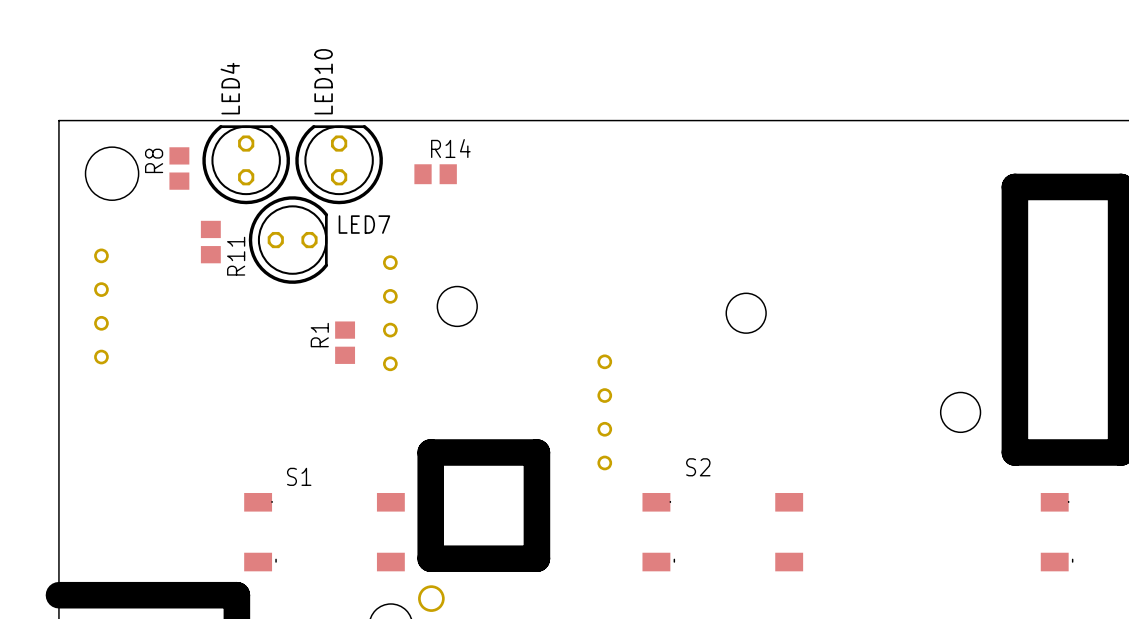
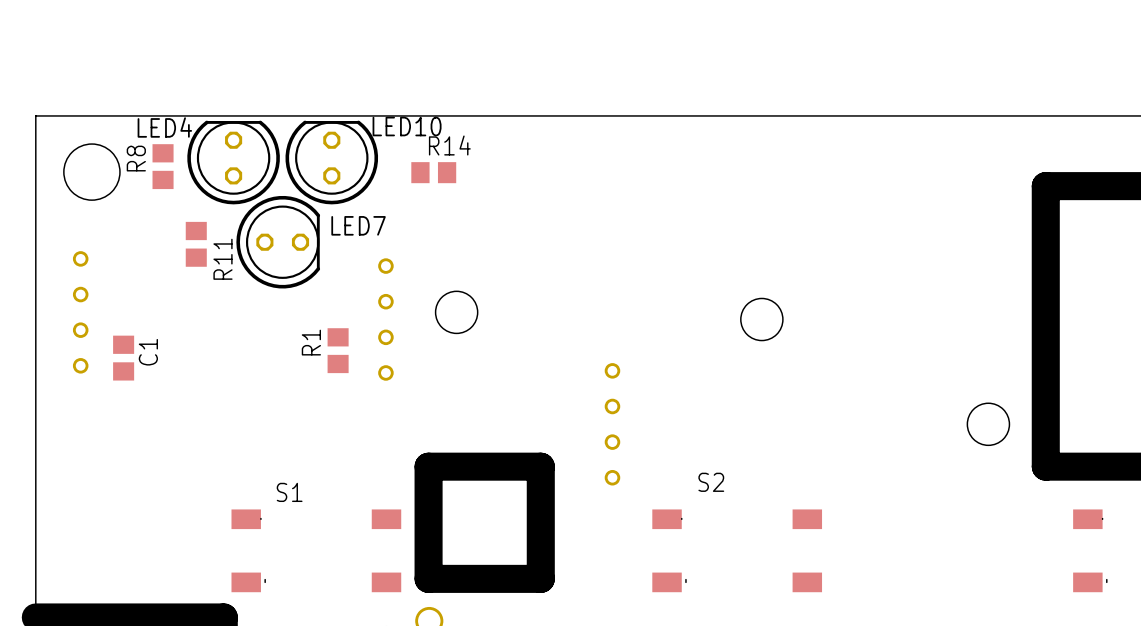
LED10 name rotation: 0° (323, 81) -> 90° clockwise (407, 126)
LED10 name position: LED10 (323, 81) -> LED10 (407, 126)
LED4 name rotation: 0° (230, 88) -> 90° clockwise (164, 127)
LED4 name position: LED4 (230, 88) -> LED4 (164, 127)
C1: none -> (123, 358)

